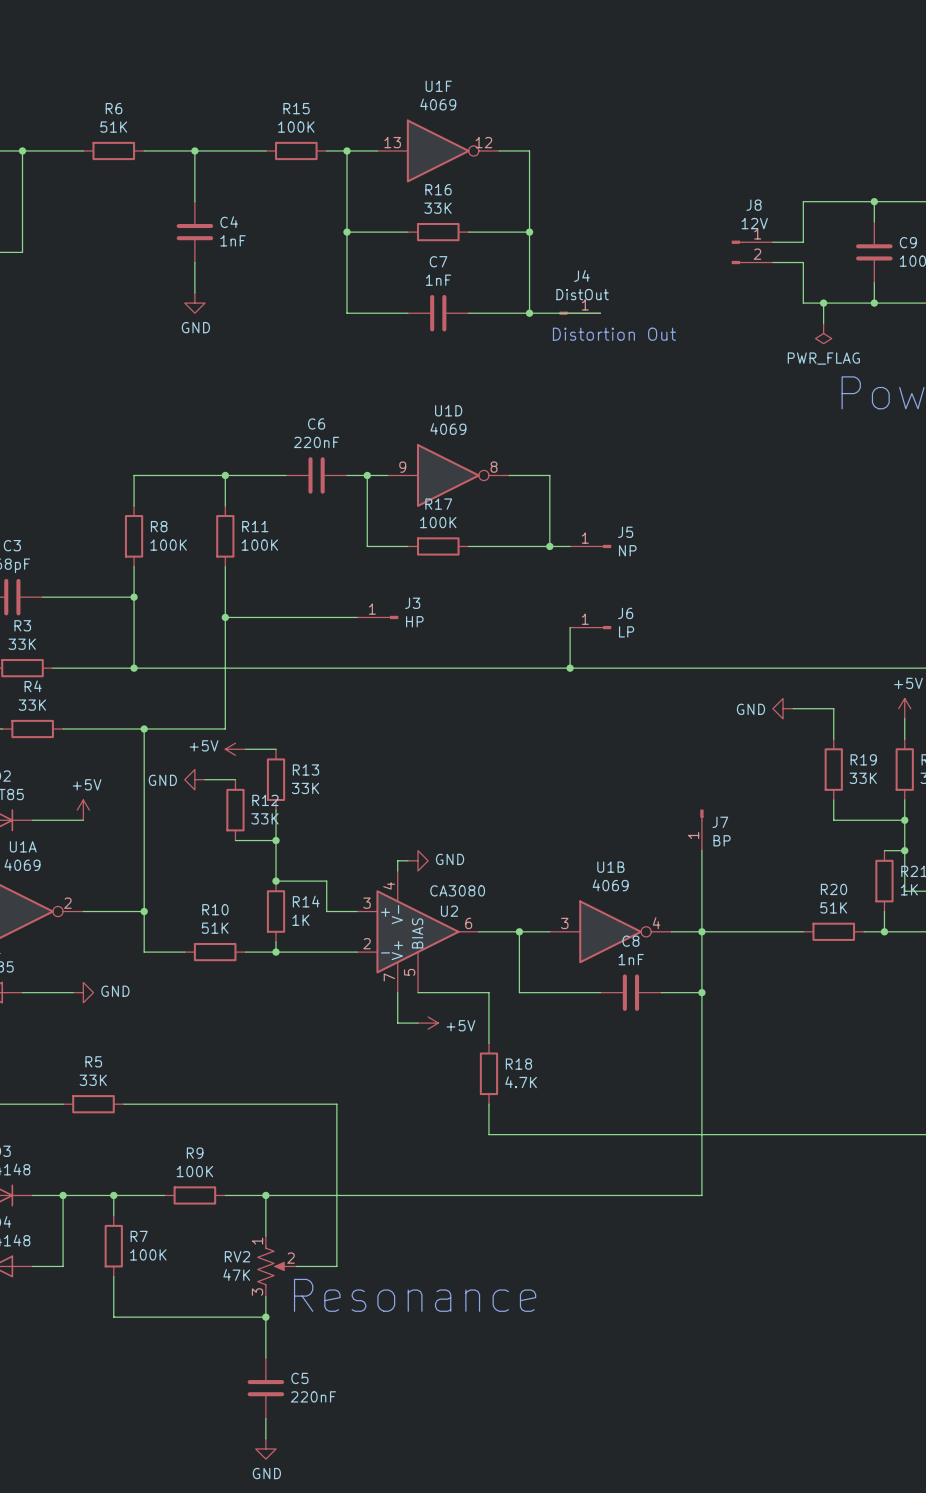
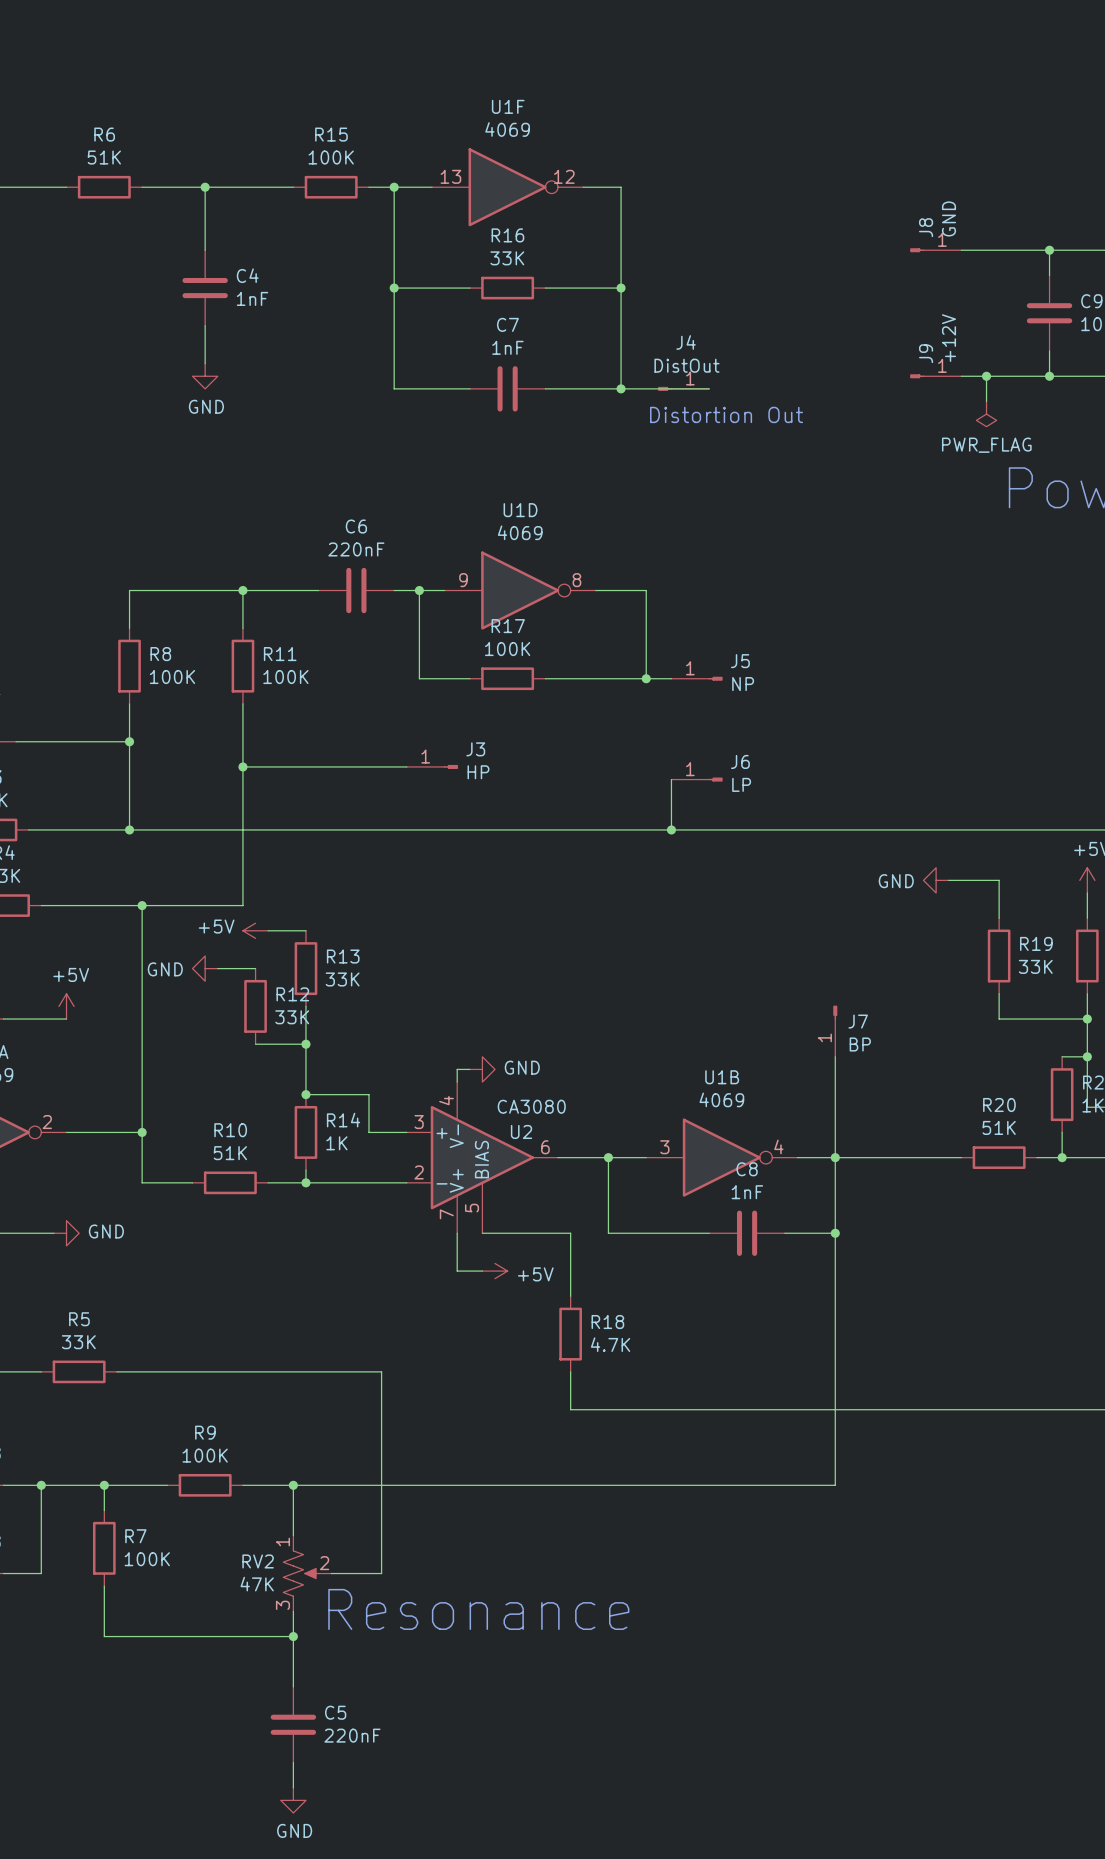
wire: (803, 201) (803, 242) (772, 242) -> none
J8 name position: J8 (754, 205) -> J8 (926, 227)
J8 value: 12V (754, 223) -> GND (949, 218)
J8 symbol: [731, 240, 773, 265] -> [910, 248, 962, 253]
wire: (772, 262) (803, 262) (803, 303) -> none
J9: none -> +12V (935, 376)

